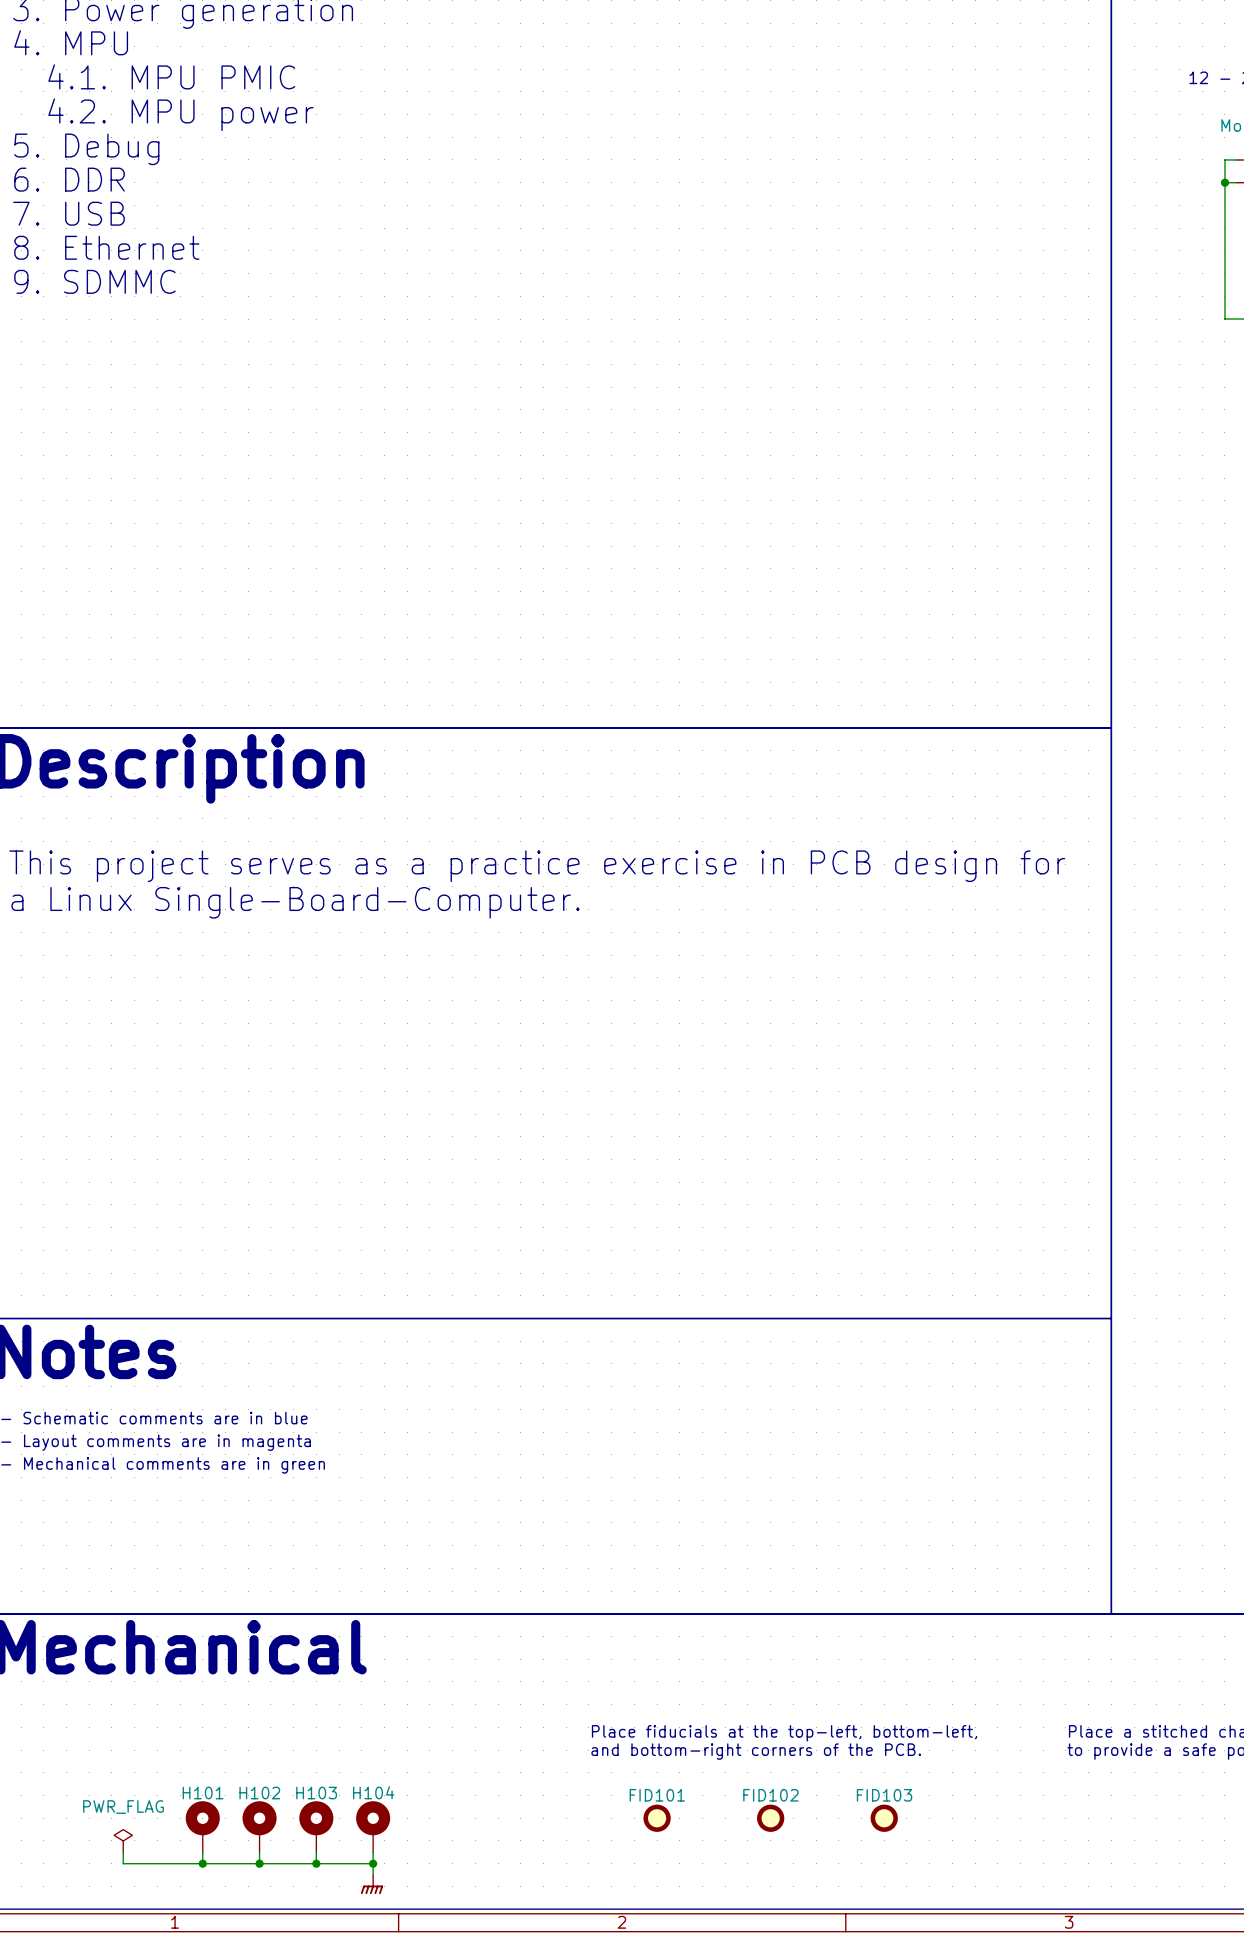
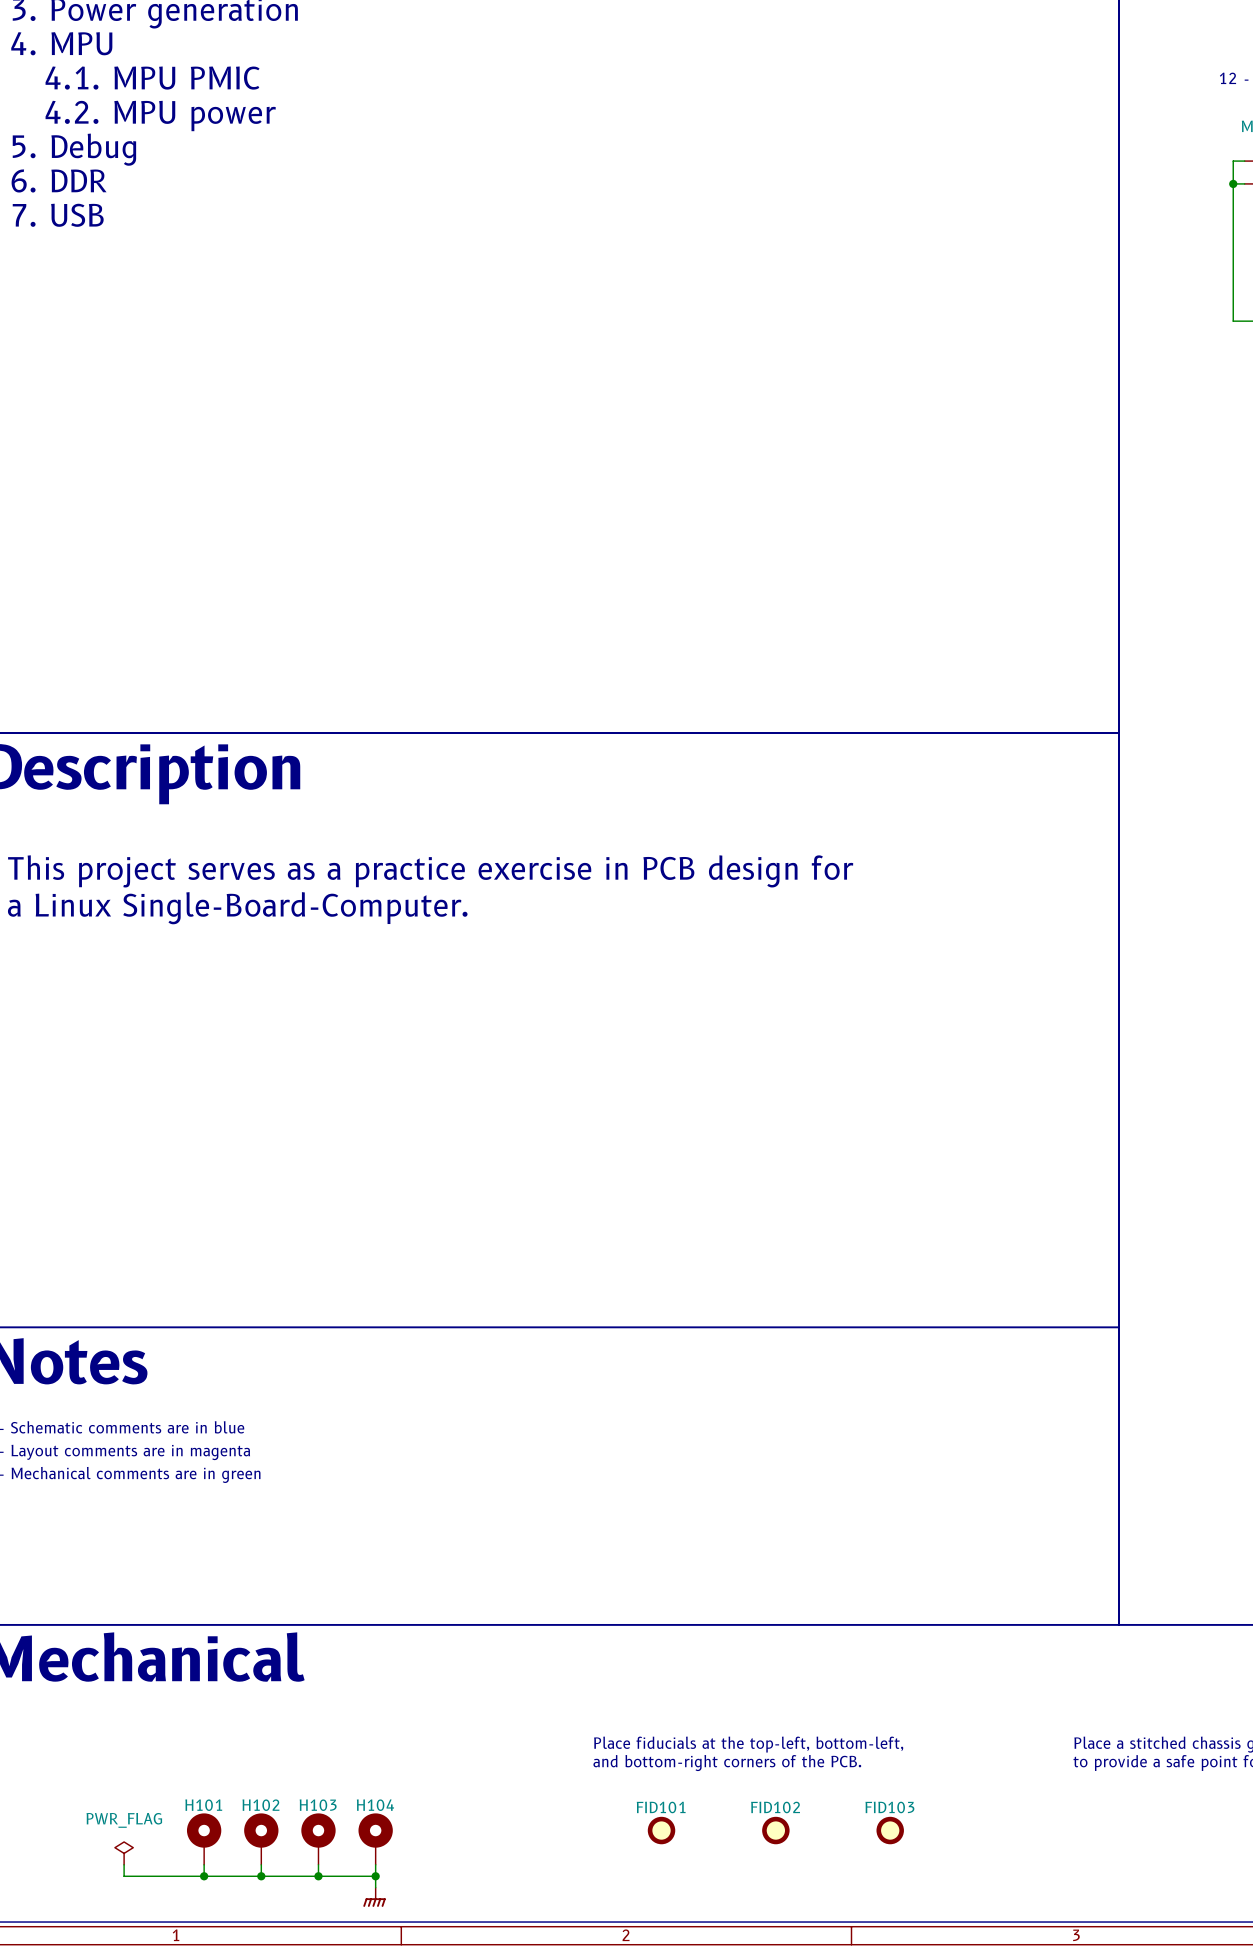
text: 8. Ethernet (106, 247) -> none
text: 9. SDMMC (94, 281) -> none

